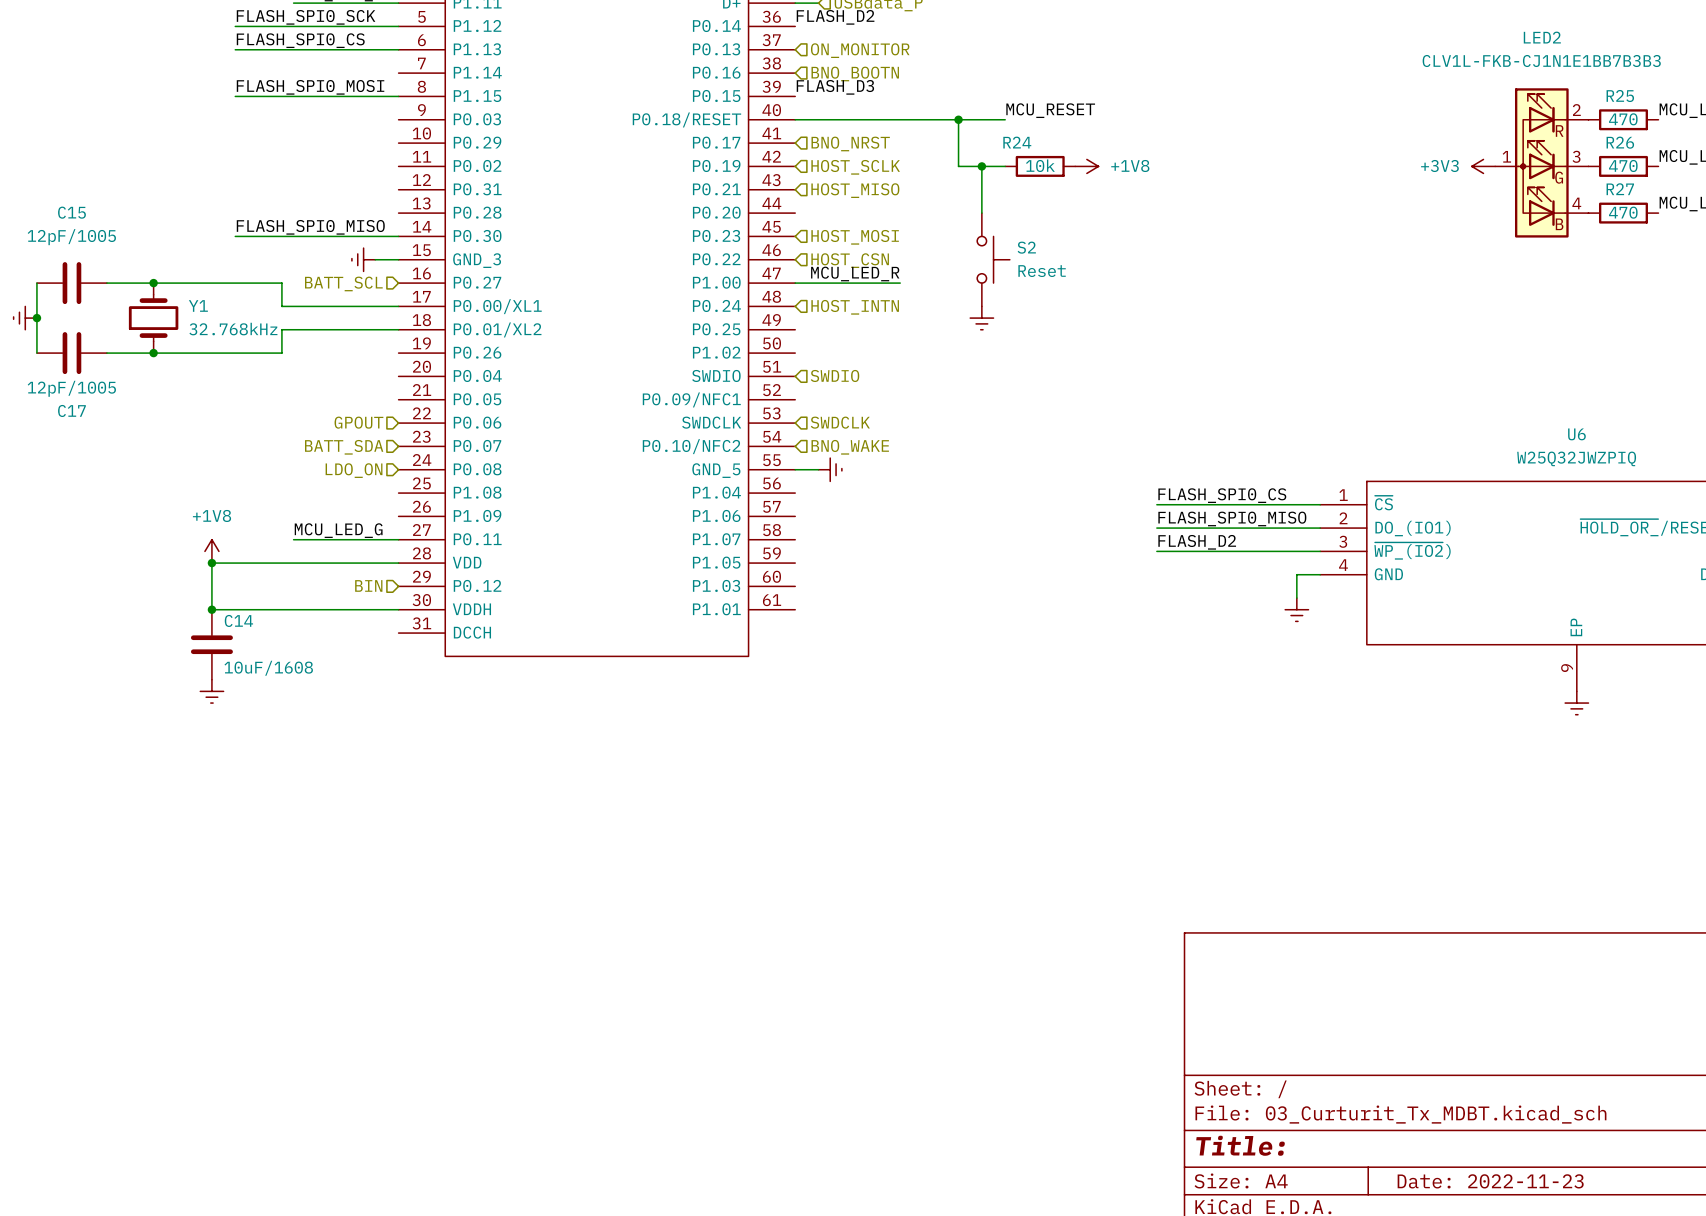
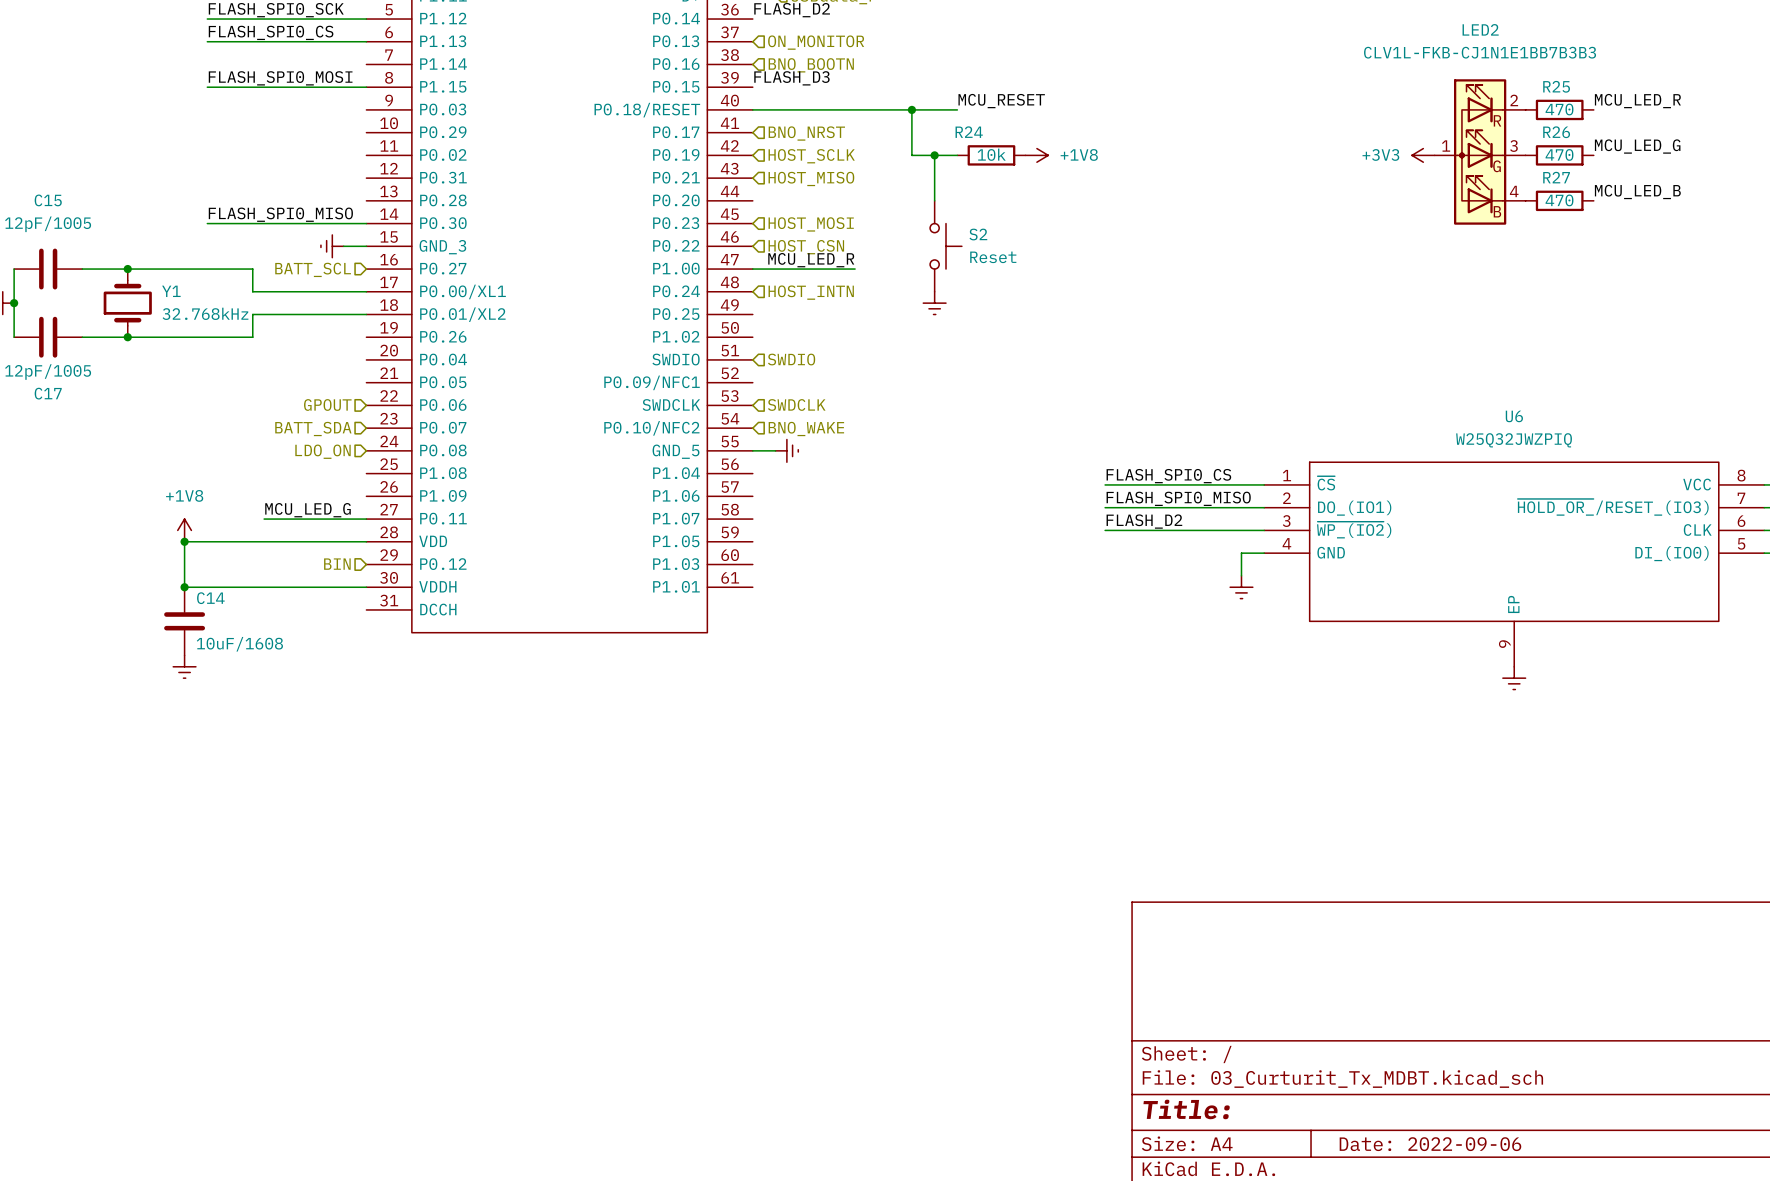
title block: Date: 2022-11-23 (1490, 1181) -> Date: 2022-09-06 (1430, 1144)

